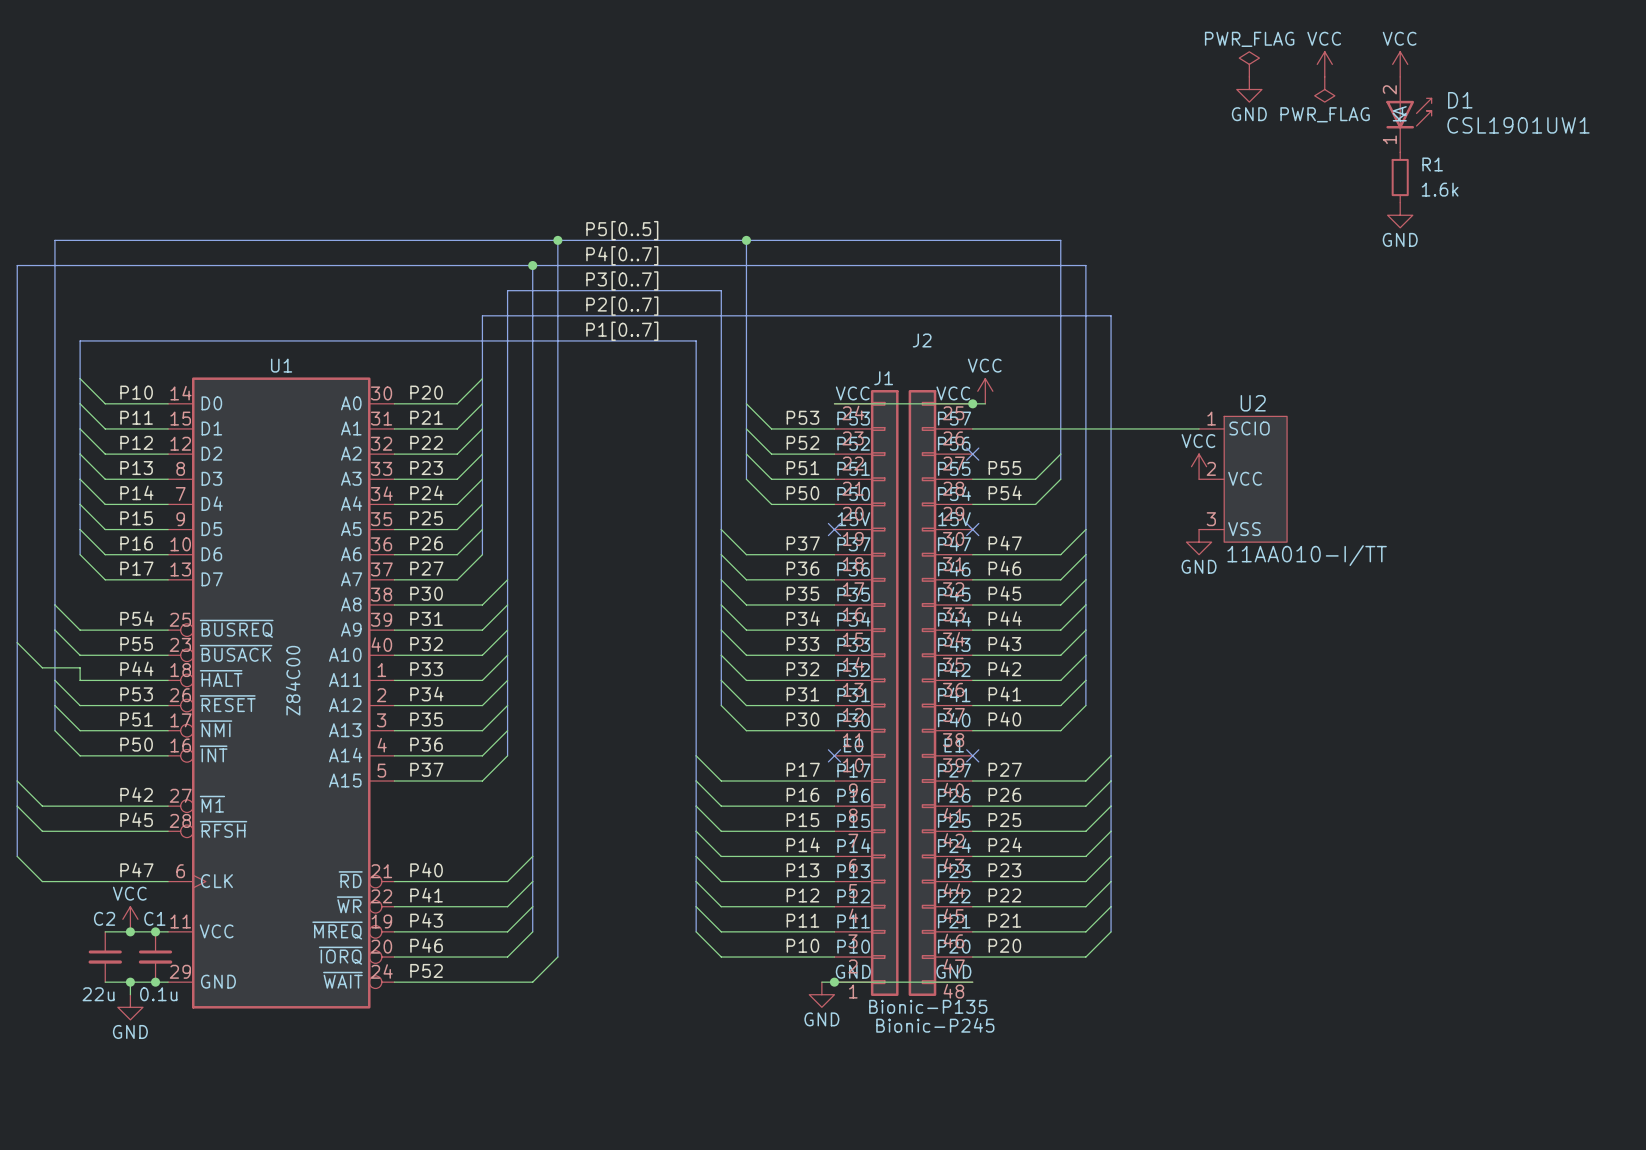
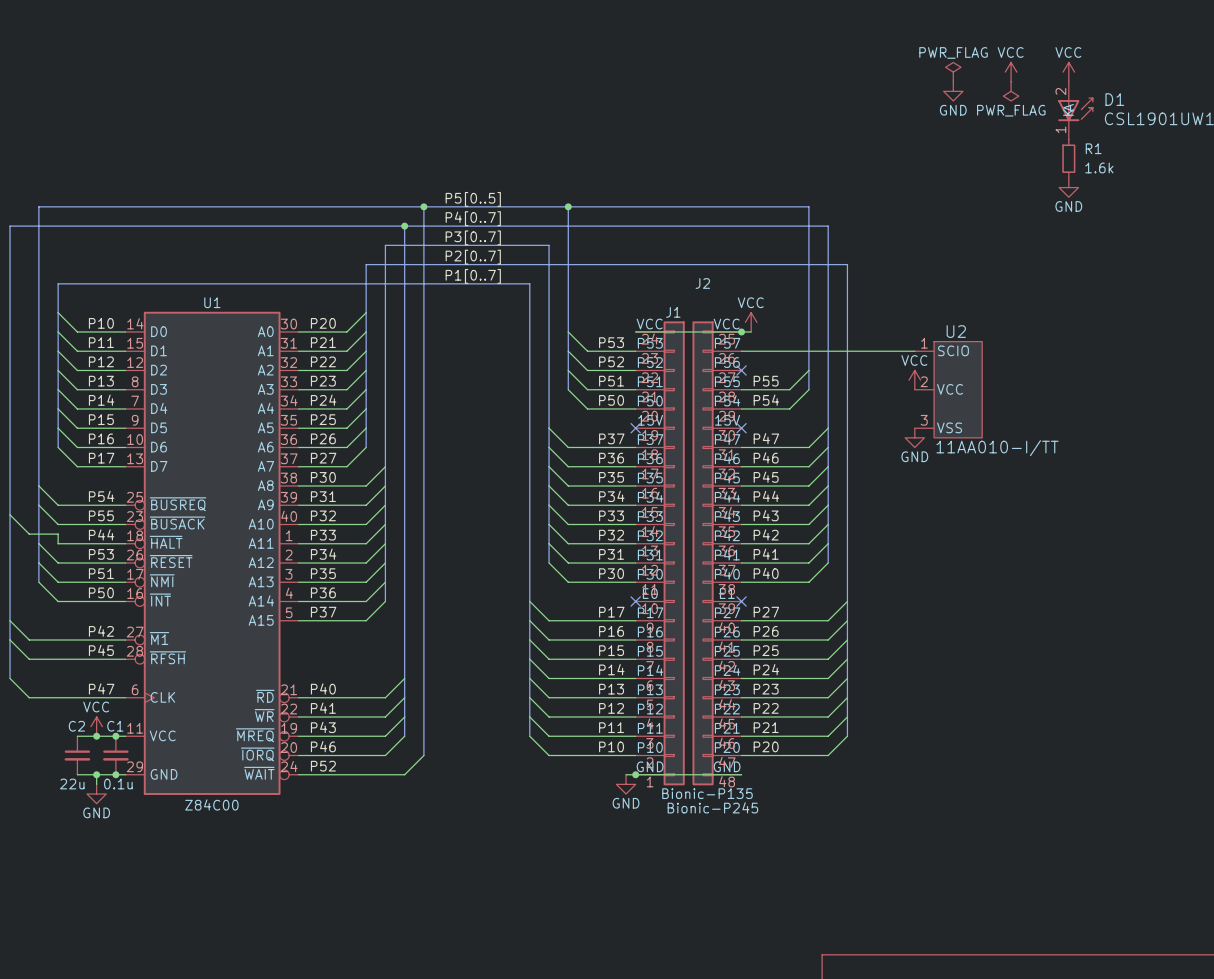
U1 value rotation: 0° (293, 680) -> 90° clockwise (211, 804)
U1 value position: Z84C00 (293, 680) -> Z84C00 (211, 804)

